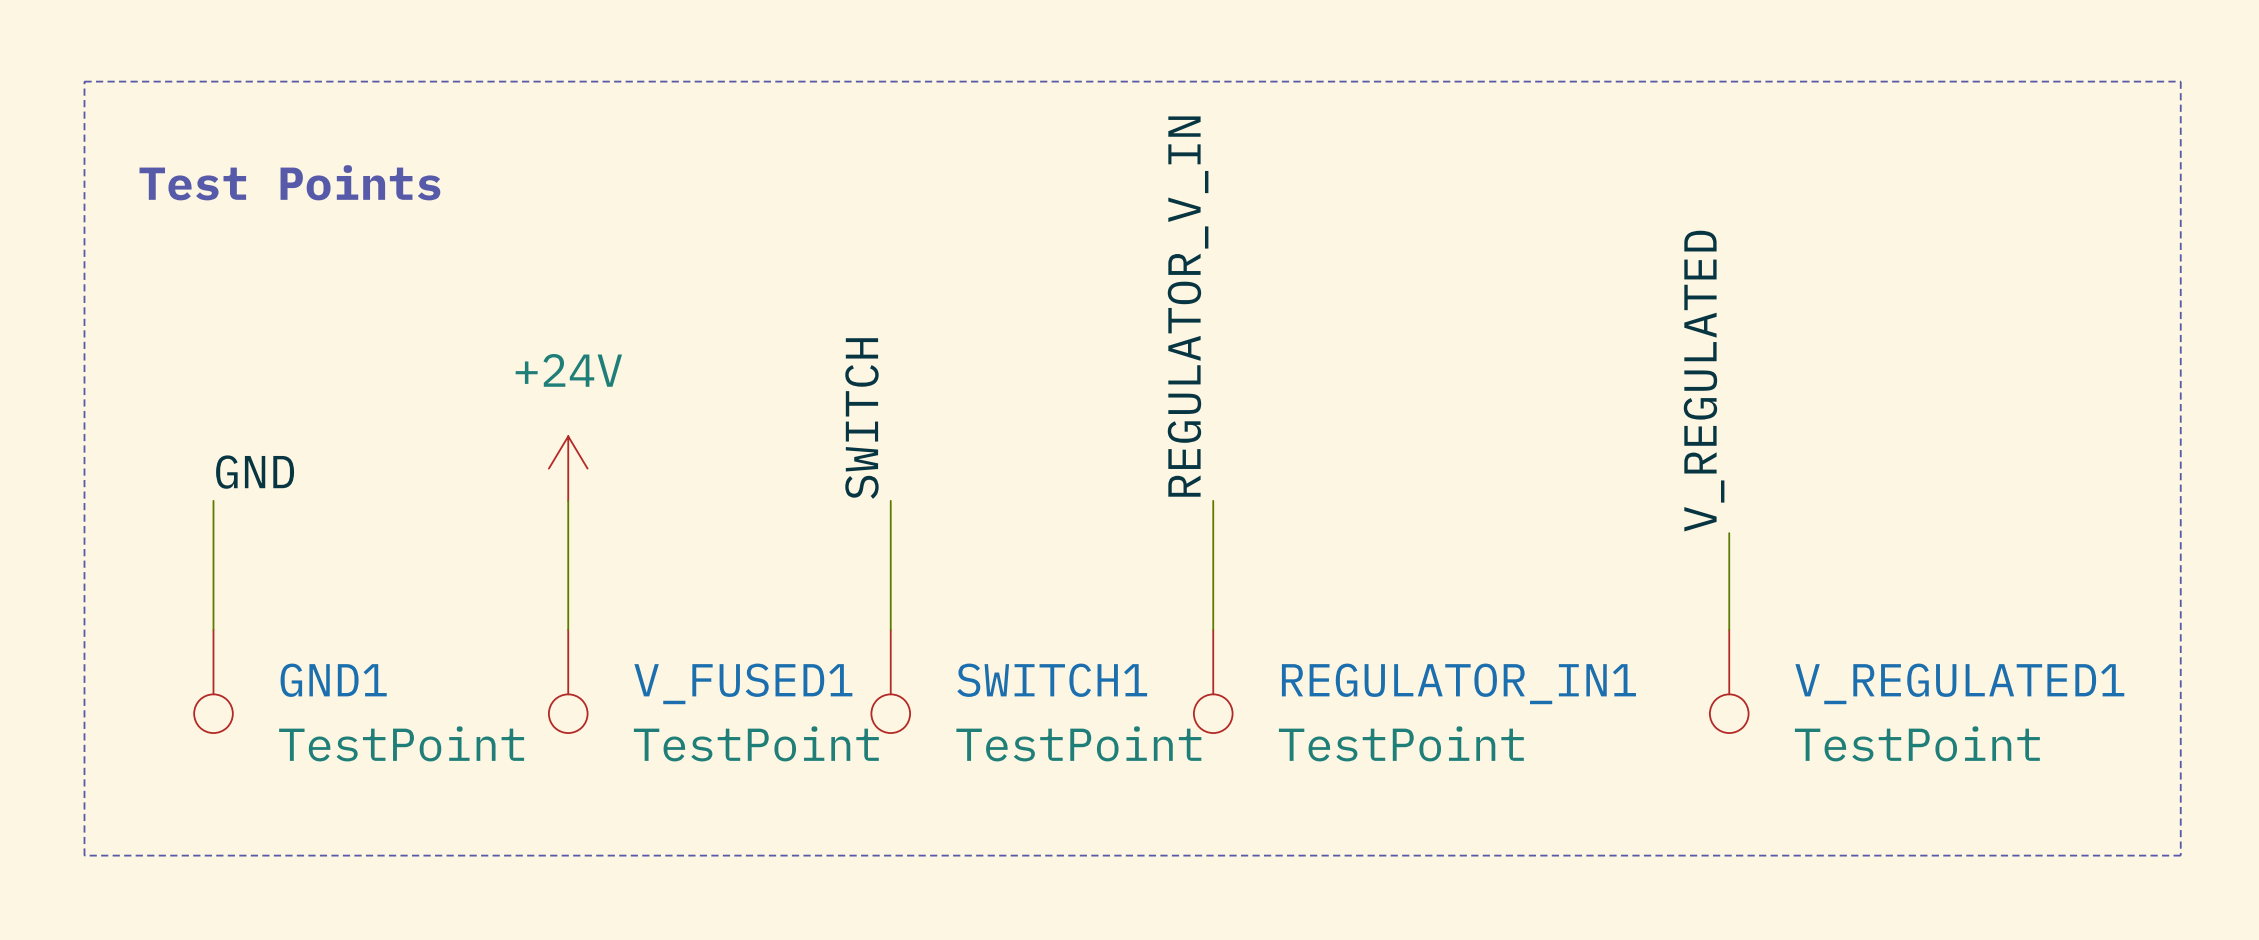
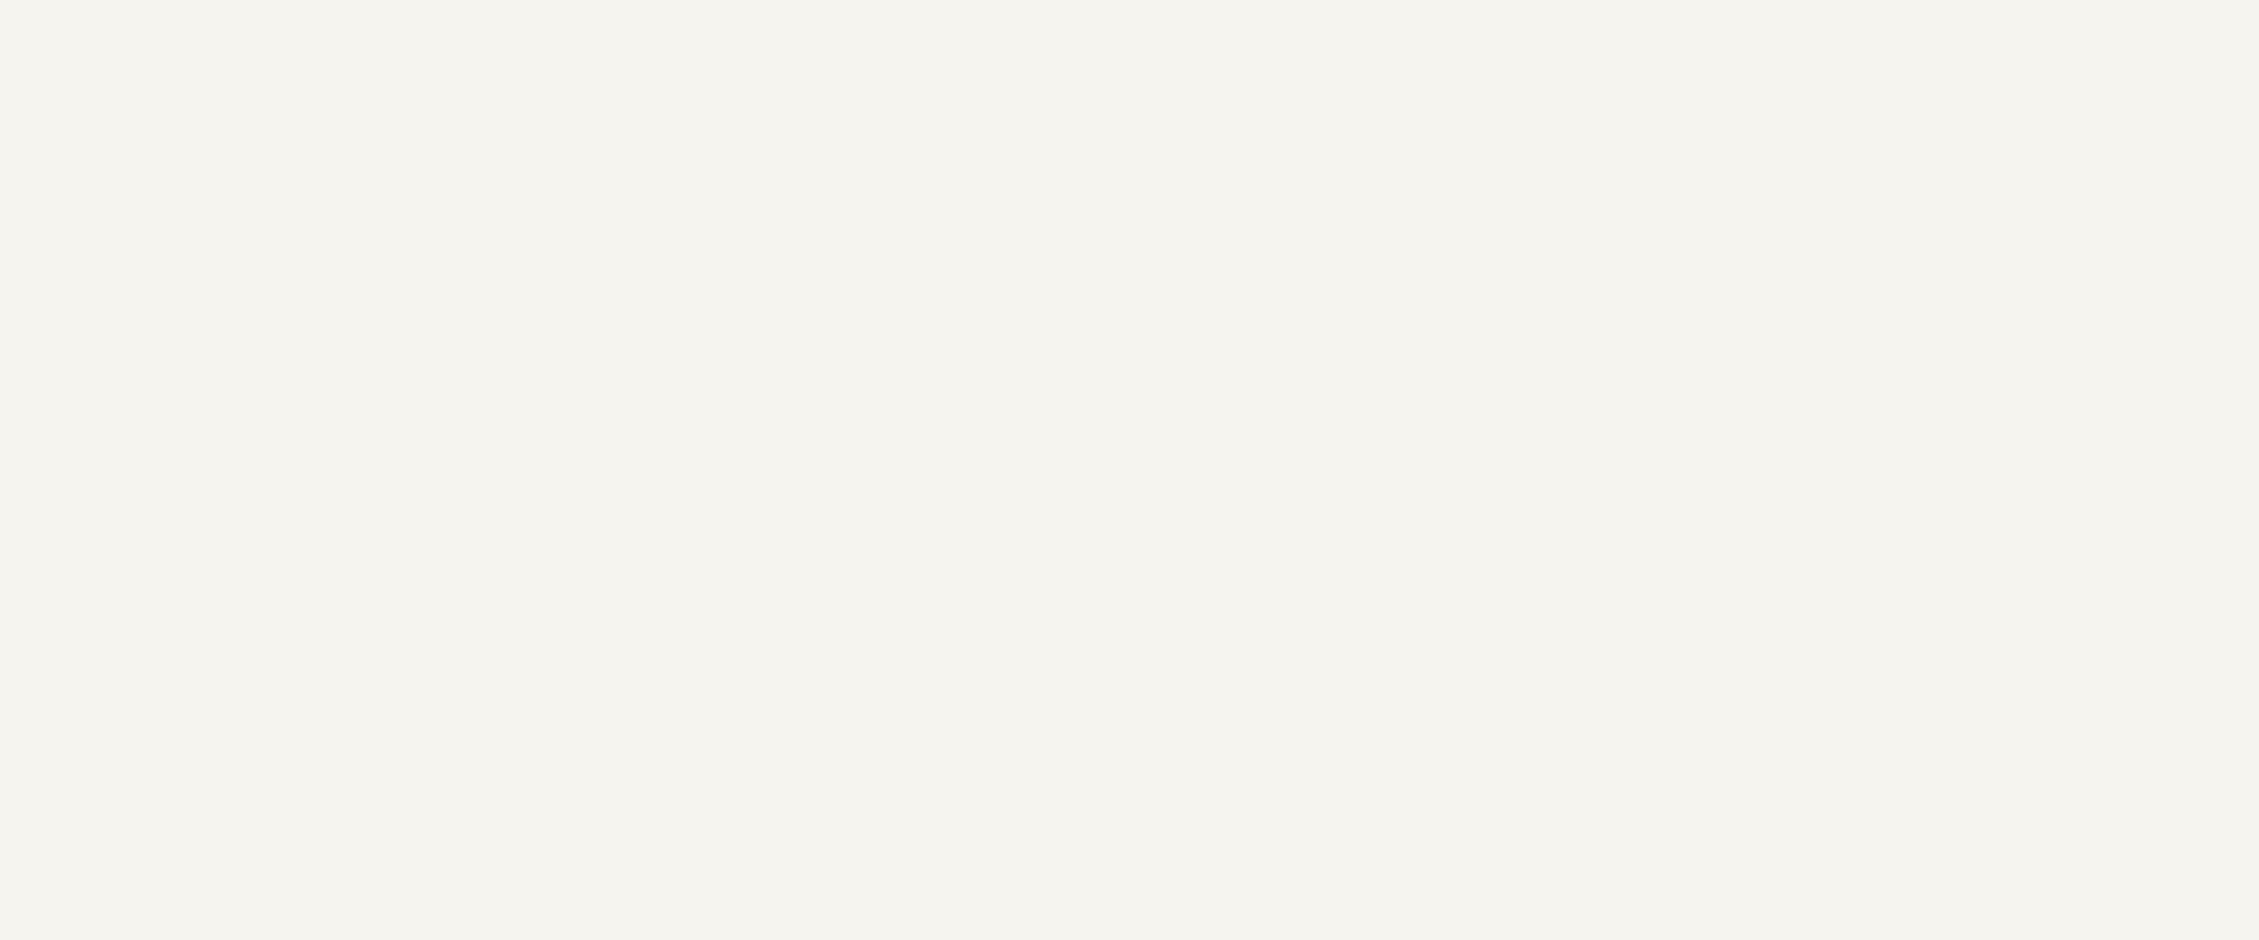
line: (84, 81) (2180, 81) (2180, 855) (84, 855) (84, 81) -> none
text: Test Points (289, 182) -> none
label: REGULATOR_V_IN (1188, 306) -> none
label: V_REGULATED (1704, 381) -> none
label: SWITCH (861, 418) -> none
power symbol: +24V (568, 468) -> none
label: GND (255, 472) -> none
wire: (213, 500) (213, 629) -> none
wire: (568, 500) (568, 629) -> none
wire: (890, 500) (890, 629) -> none
wire: (1213, 500) (1213, 629) -> none
wire: (1729, 533) (1729, 629) -> none
GND1: TestPoint (213, 681) -> none
V_FUSED1: TestPoint (568, 681) -> none
SWITCH1: TestPoint (890, 681) -> none
REGULATOR_IN1: TestPoint (1213, 681) -> none
V_REGULATED1: TestPoint (1729, 681) -> none

